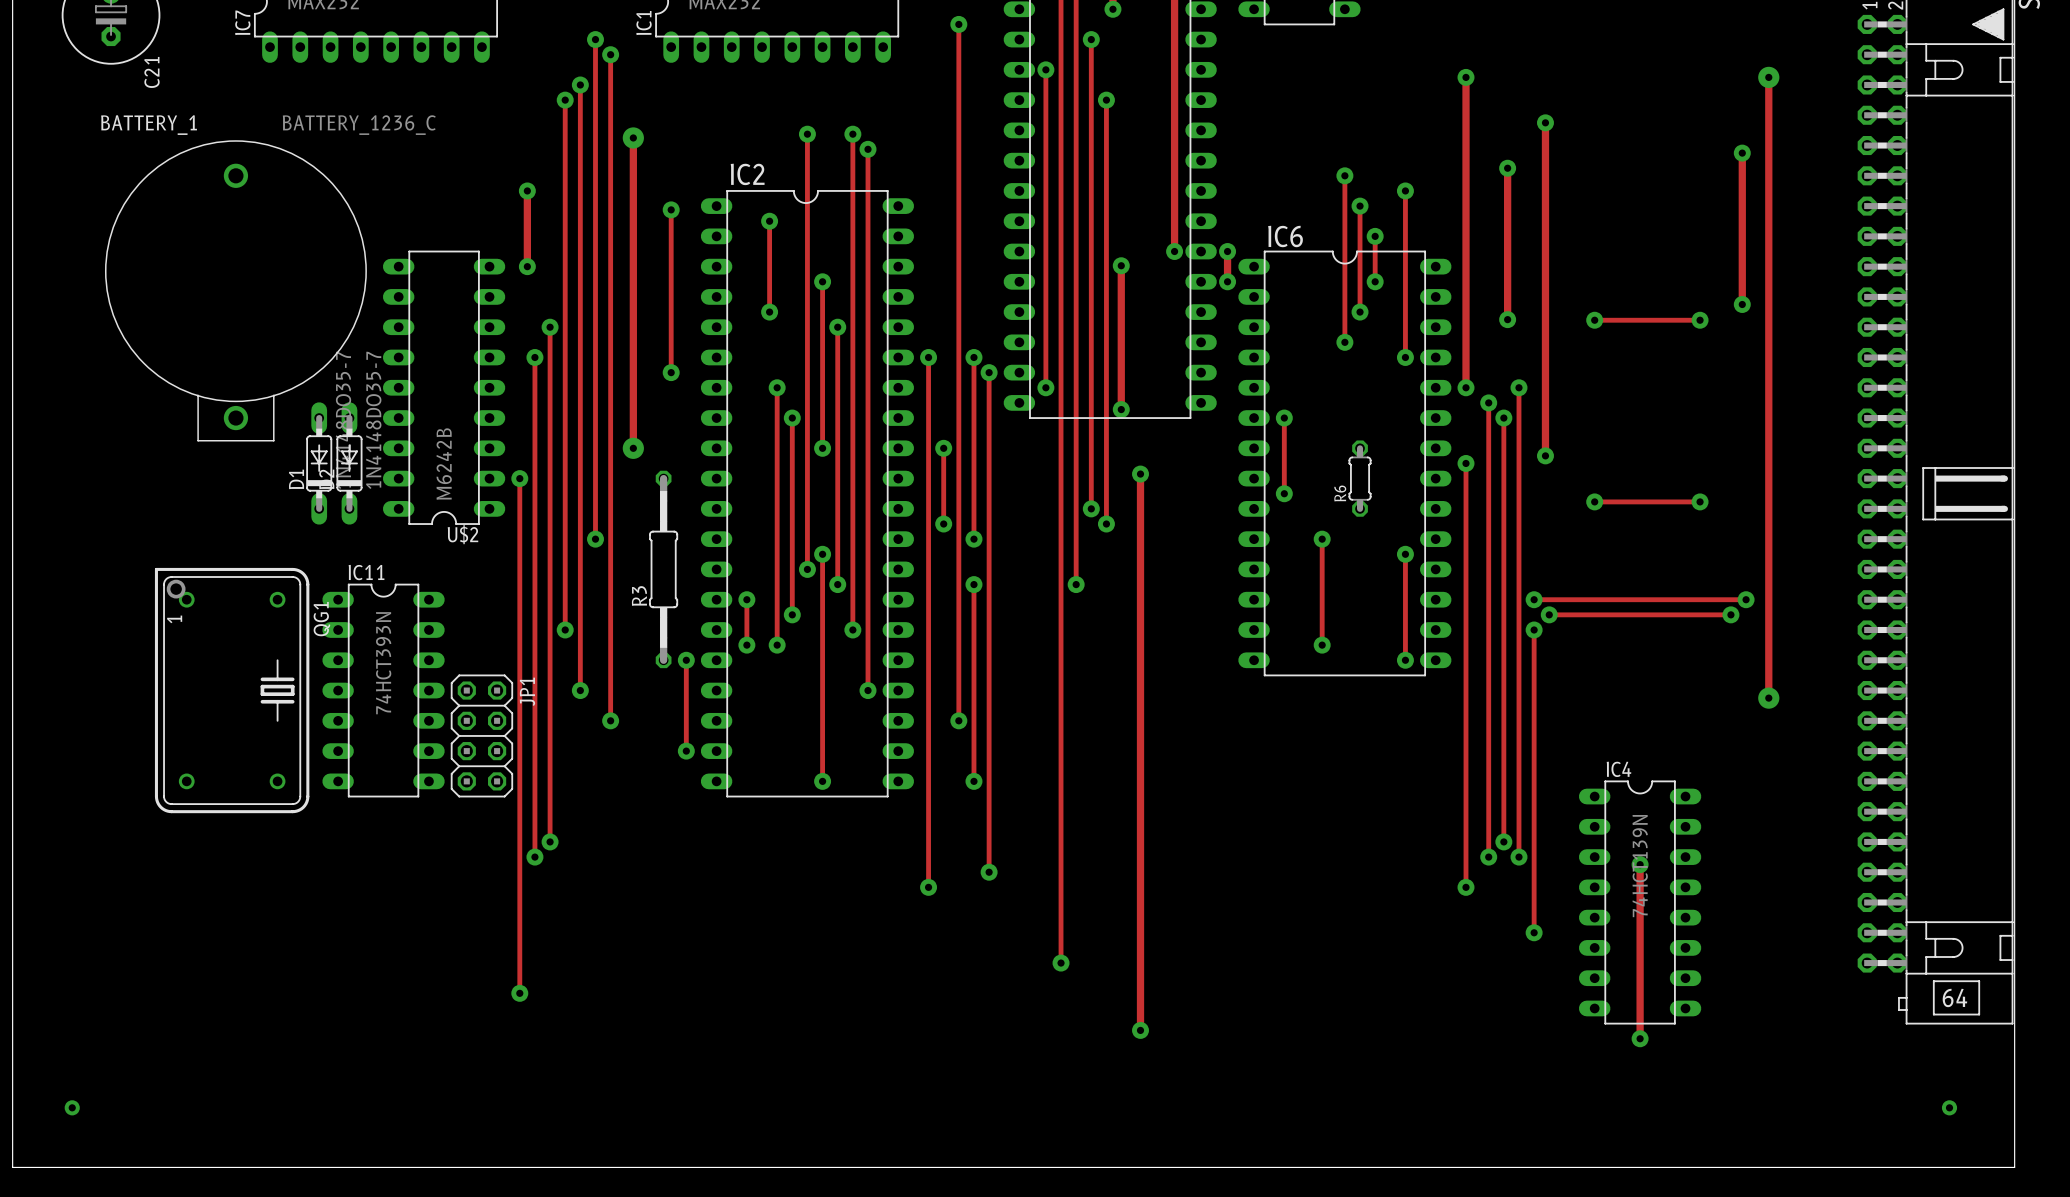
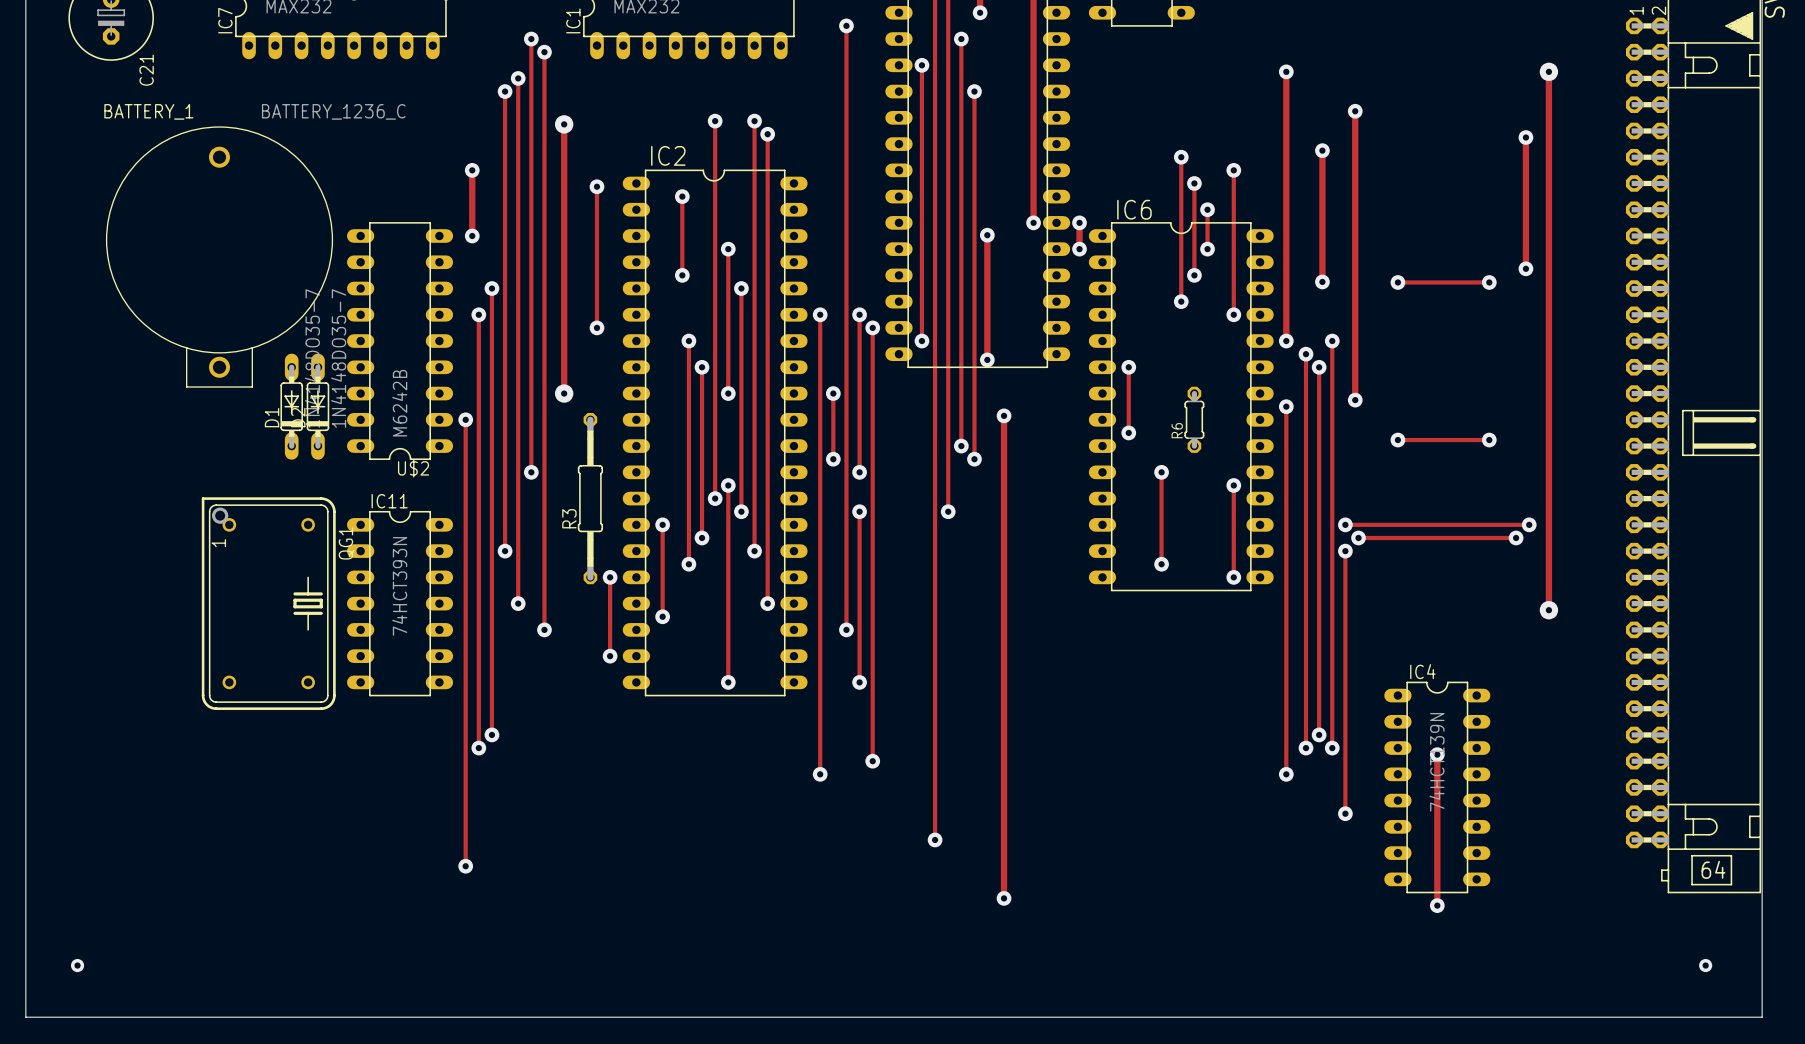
track: none -> (662, 564) (662, 616)
via position: (746, 645) -> (662, 616)
QG1 position: (232, 690) -> (268, 603)
IC11 position: (383, 690) -> (400, 603)
JP1: (481, 735) -> none

